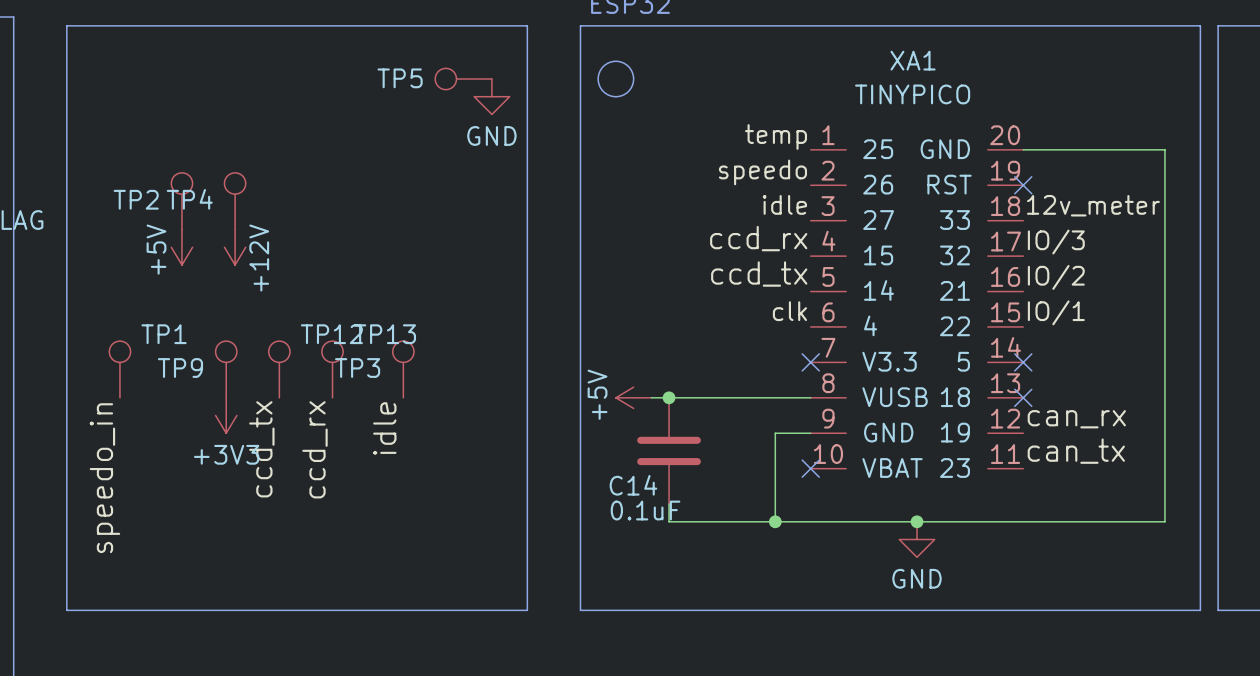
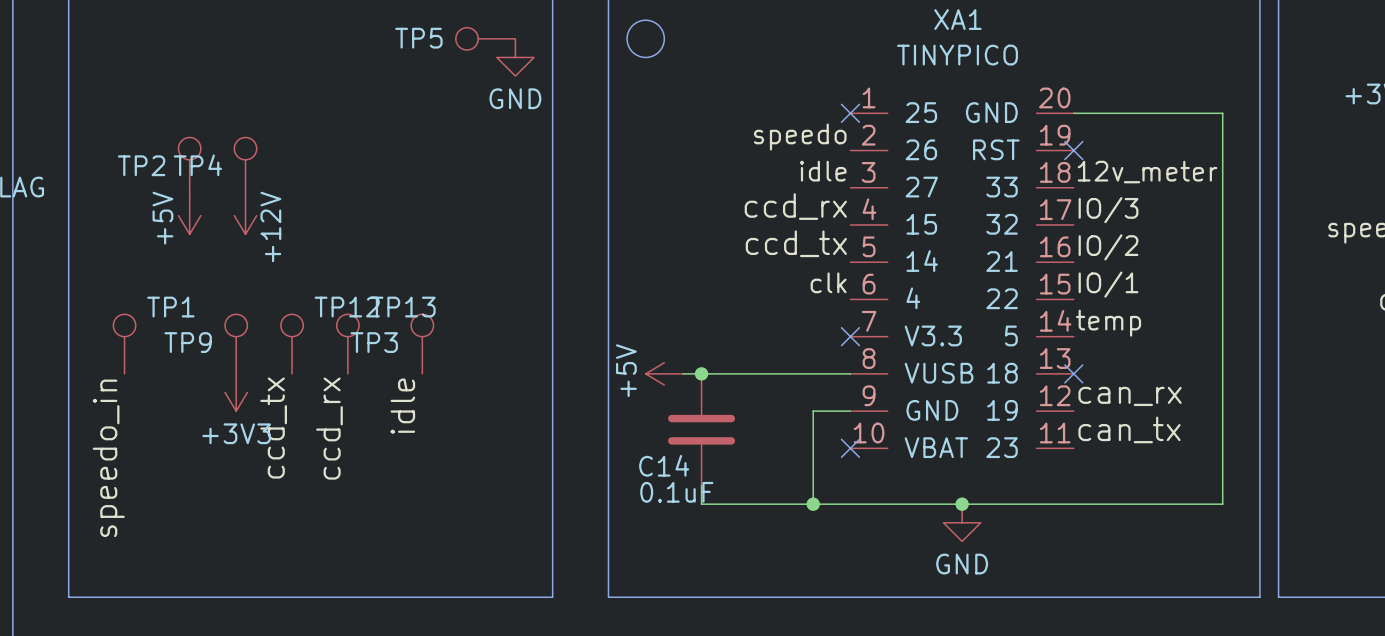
label position: temp (776, 136) -> temp (1108, 323)
no-connect mark: none -> (850, 113)
no-connect mark: (1023, 362) -> none

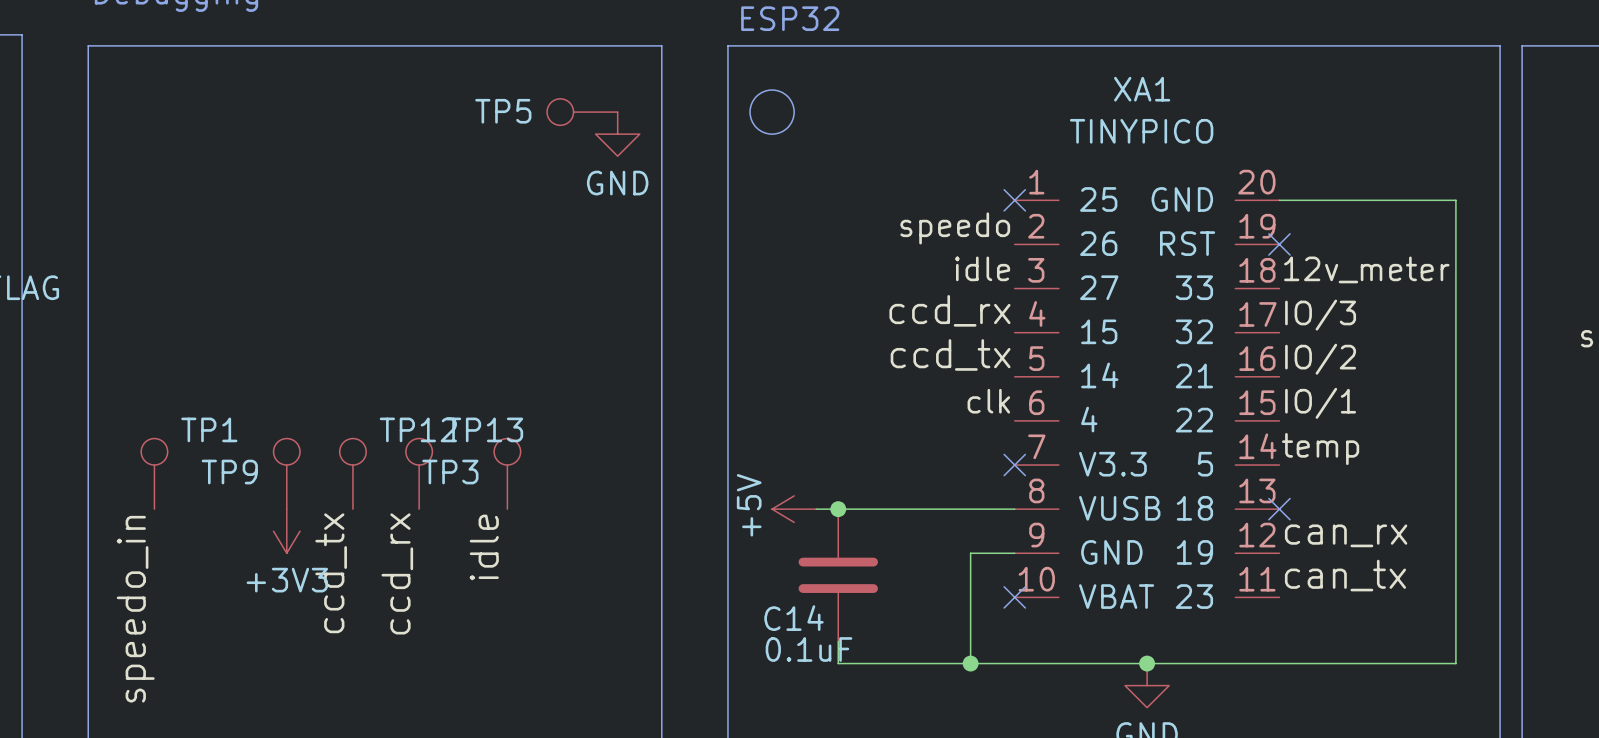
TP2: (189, 167) -> none
TP4: (245, 167) -> none
power symbol: +5V (189, 215) -> none
power symbol: +12V (245, 215) -> none

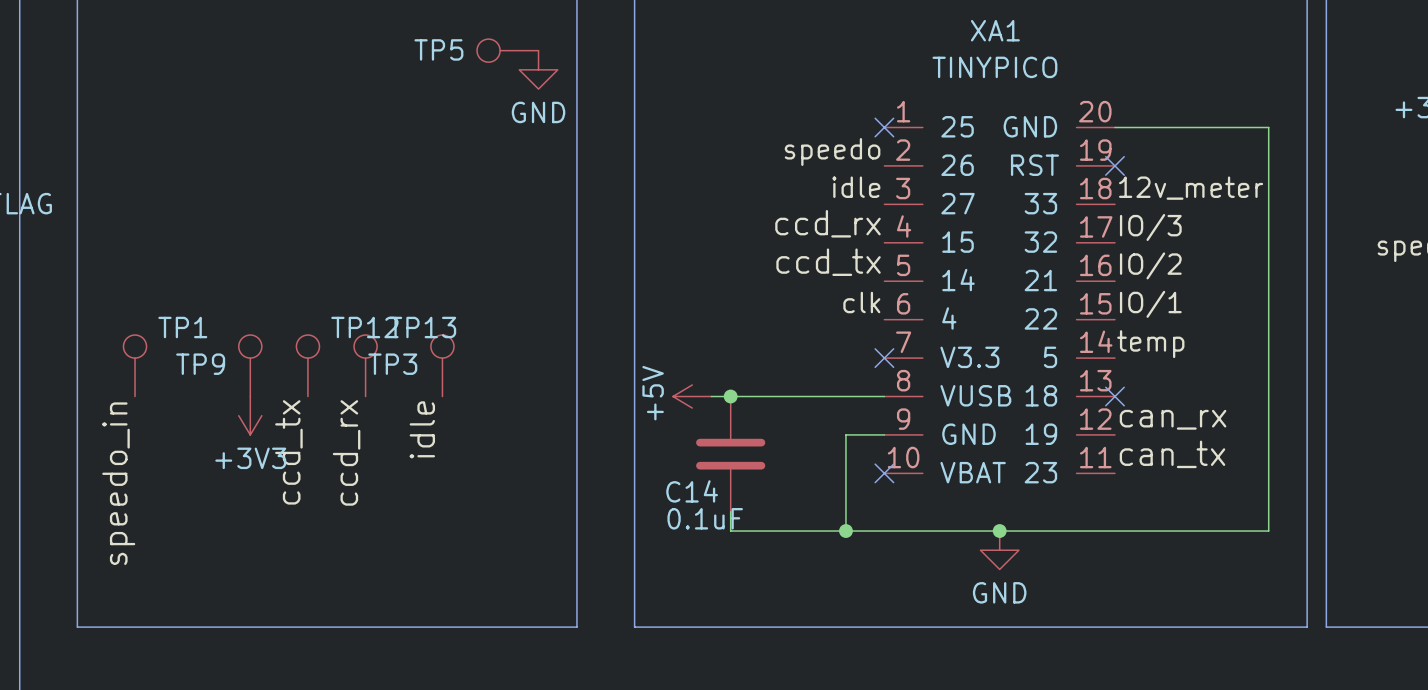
drawing: [750, 90, 795, 135] -> none

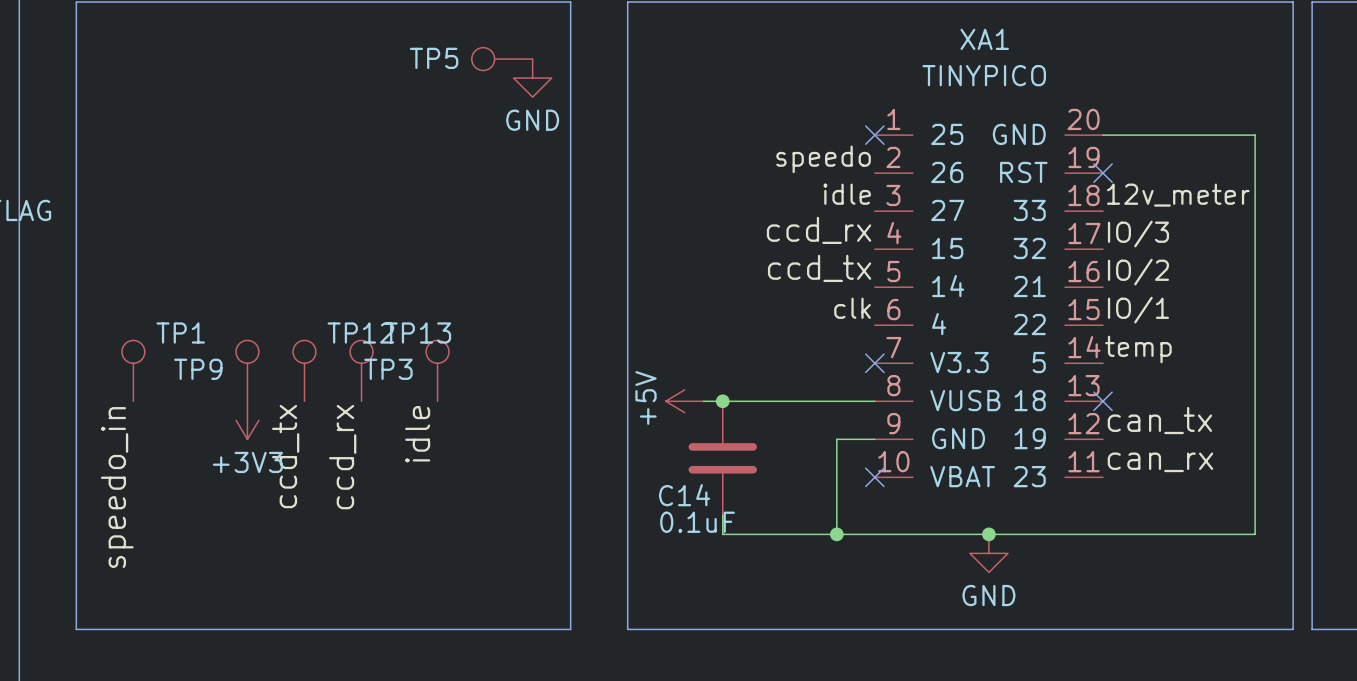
label: can_rx (1173, 419) -> can_tx (1159, 420)
label: can_tx (1172, 454) -> can_rx (1160, 462)

